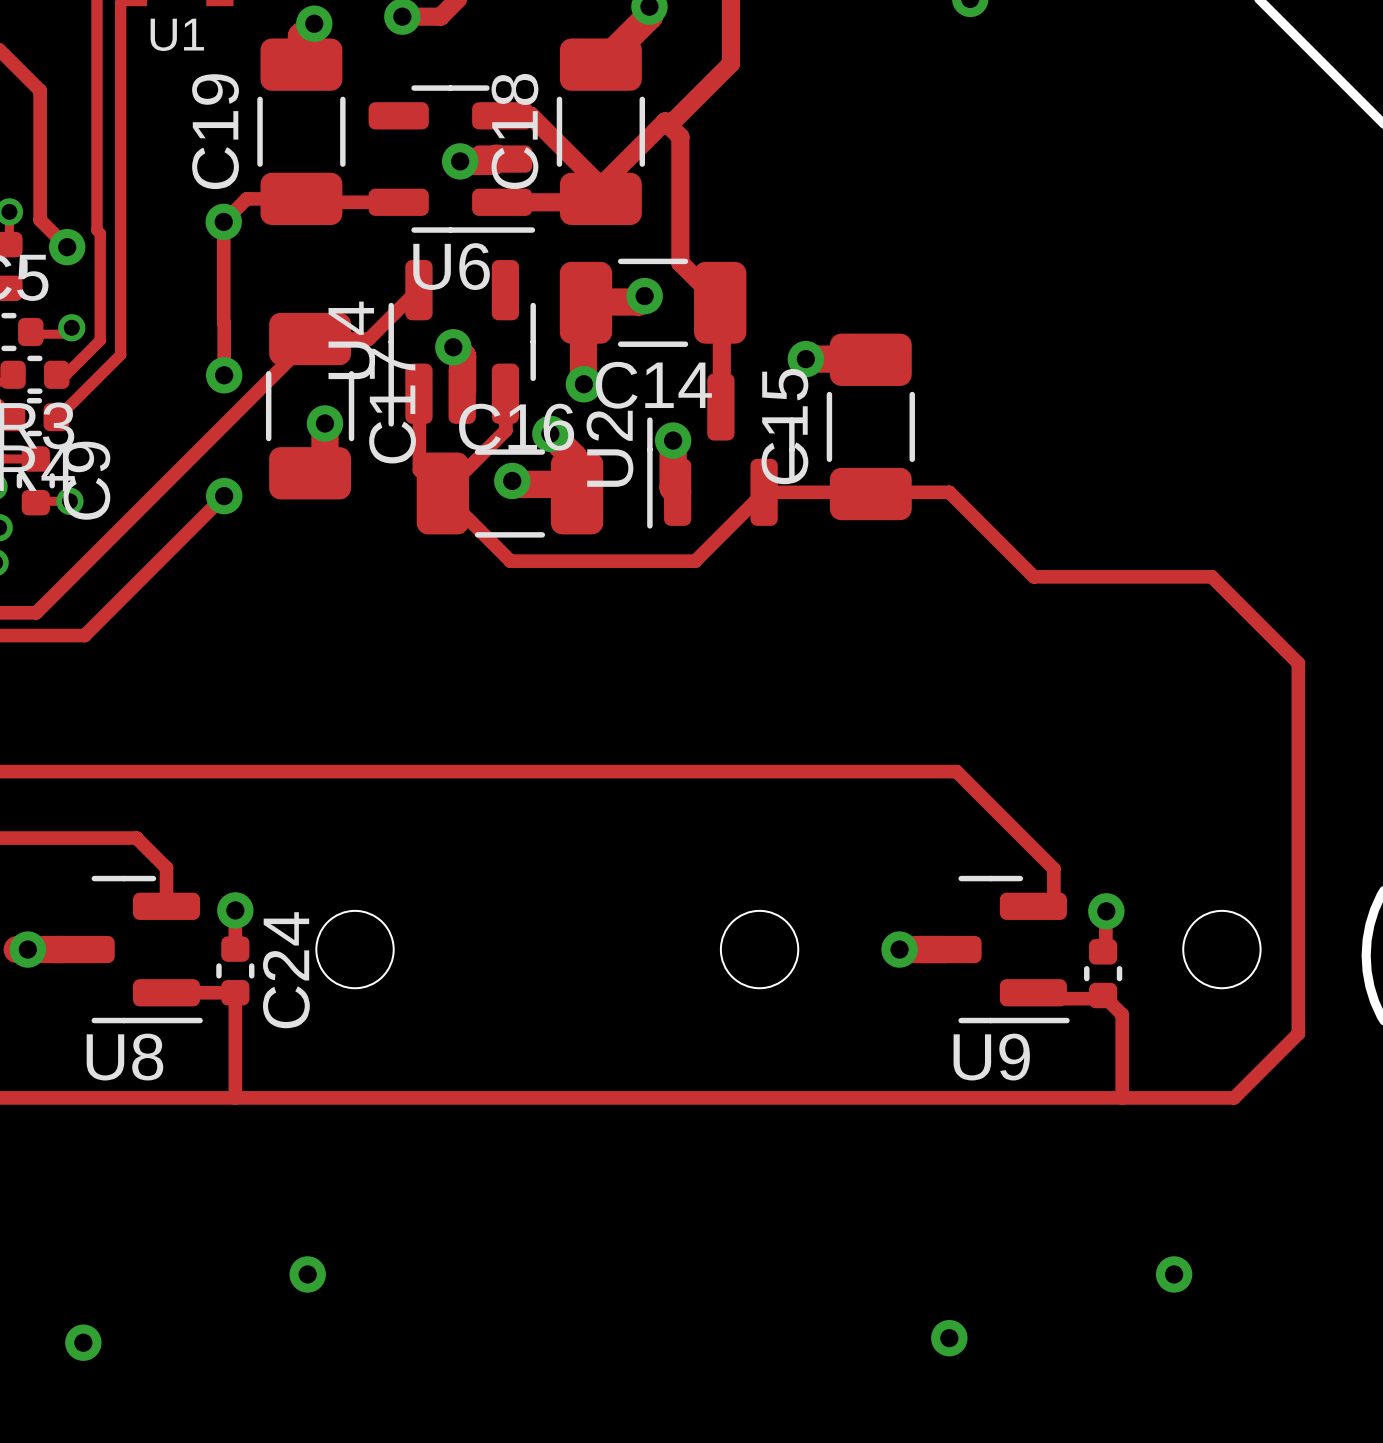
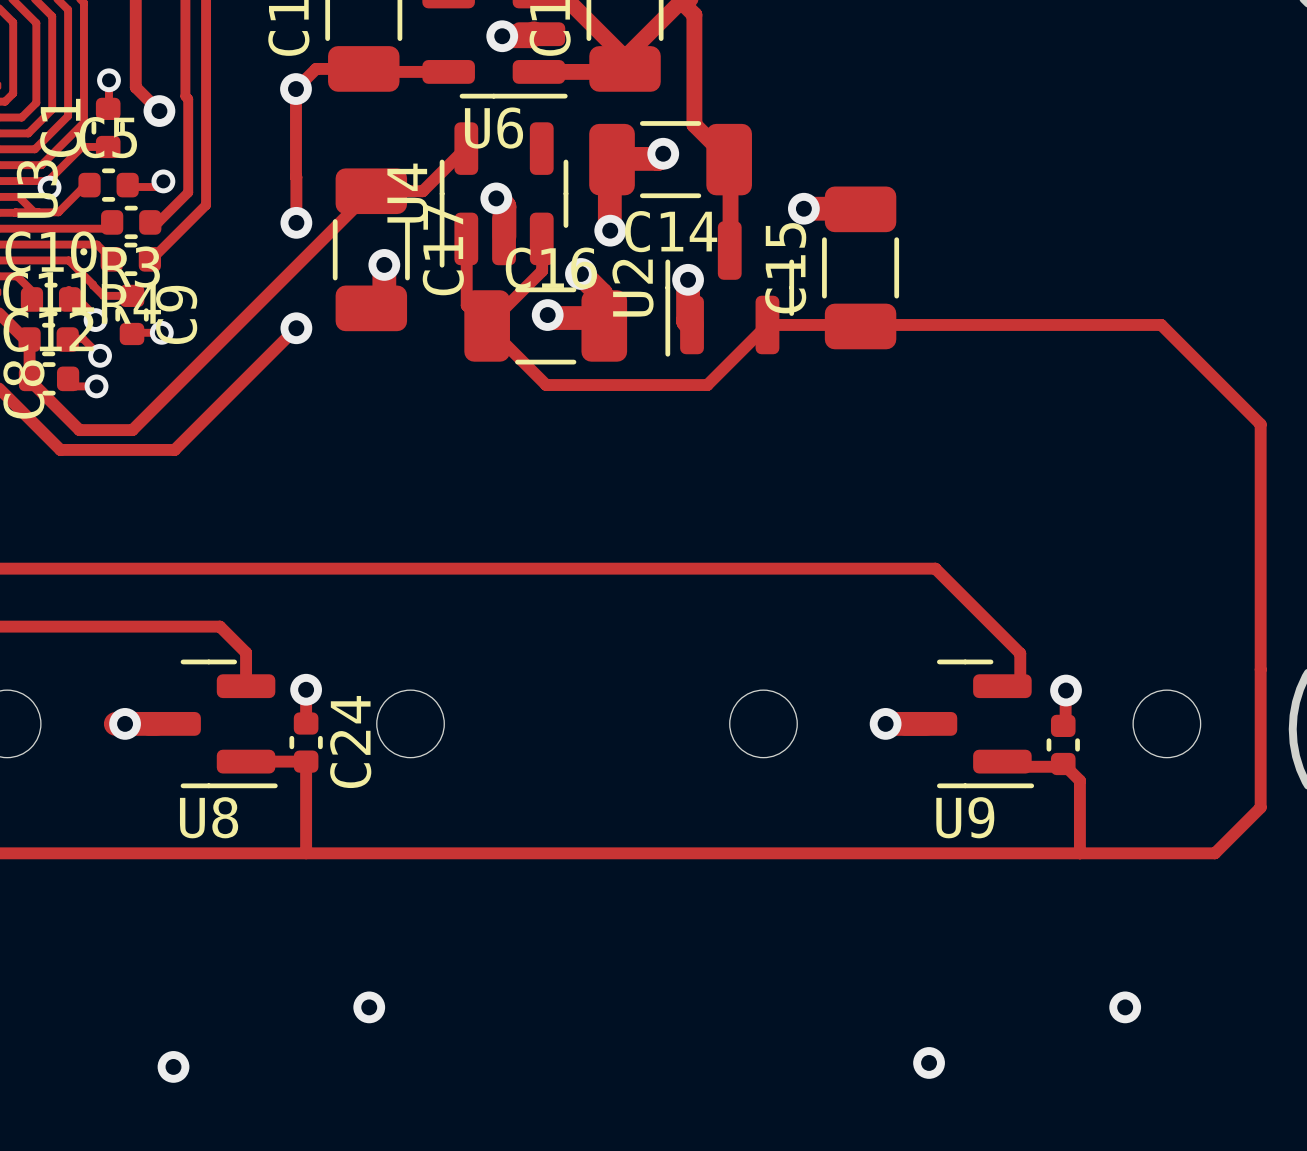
track: (949, 492) (1033, 576) (1211, 576) (1298, 663) (1298, 1033) (1234, 1097) -> (929, 324) (1161, 324) (1260, 424) (1260, 807) (1214, 853) (1177, 853)

